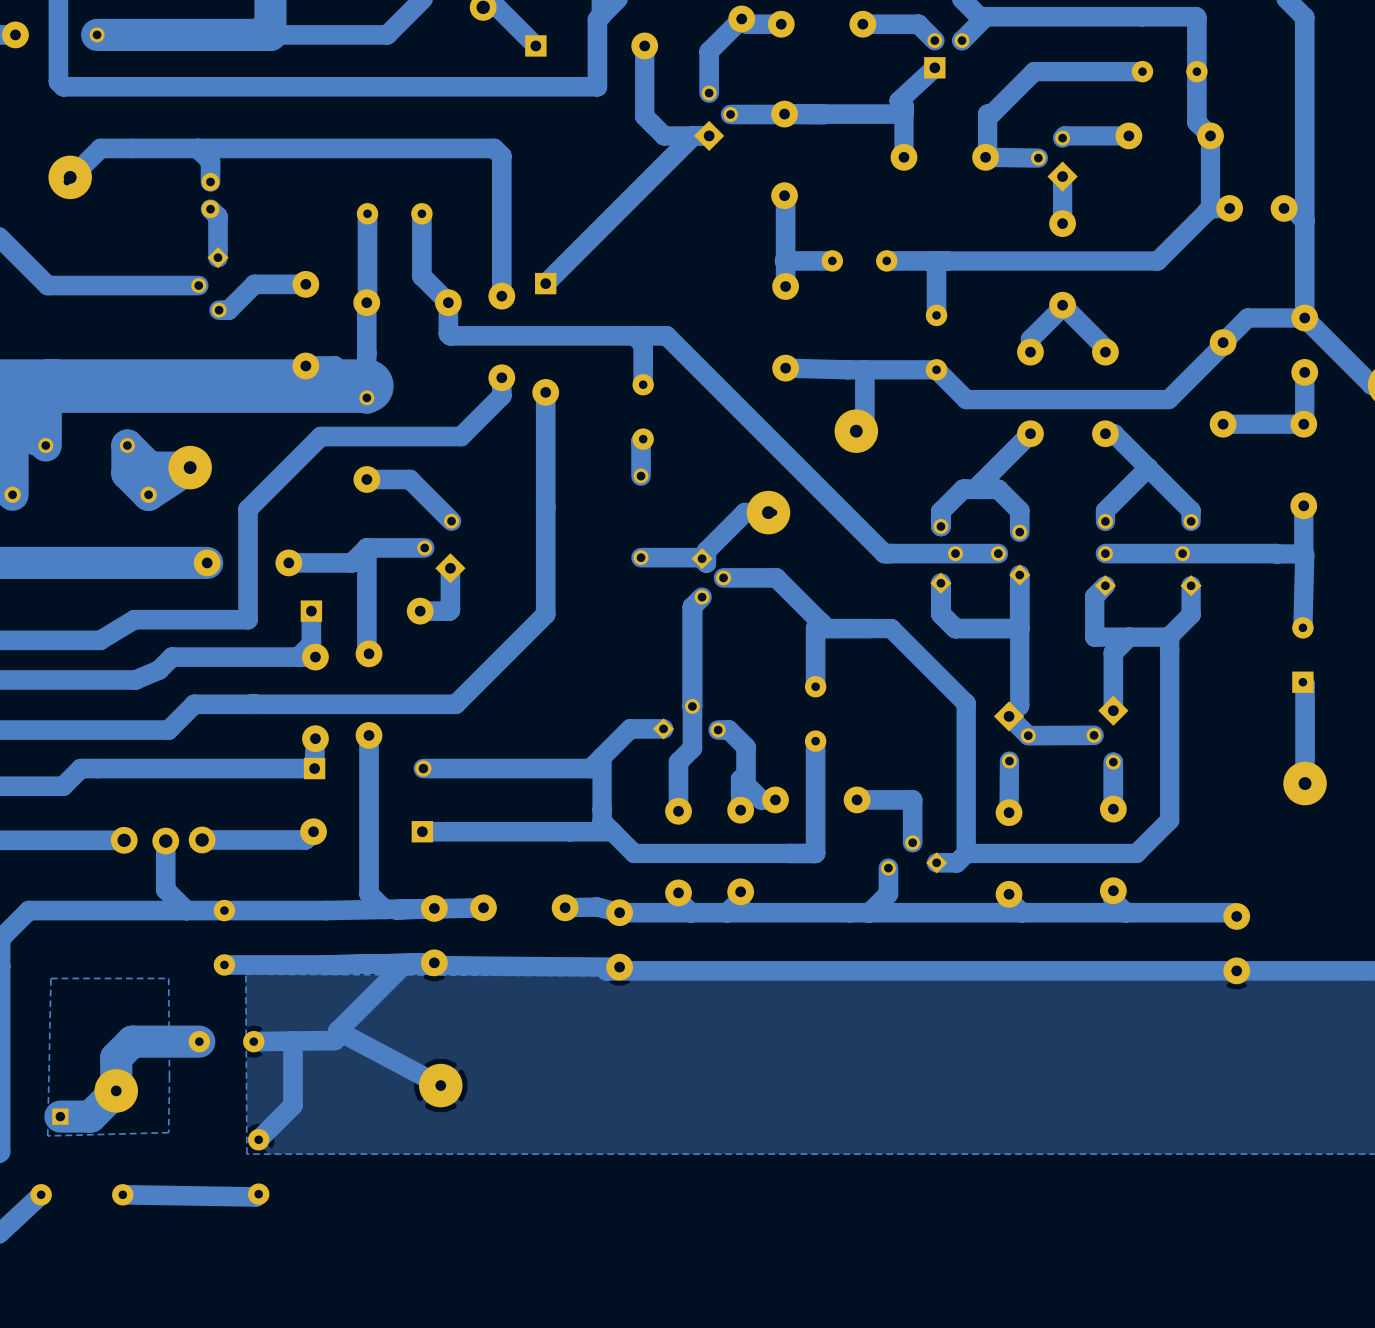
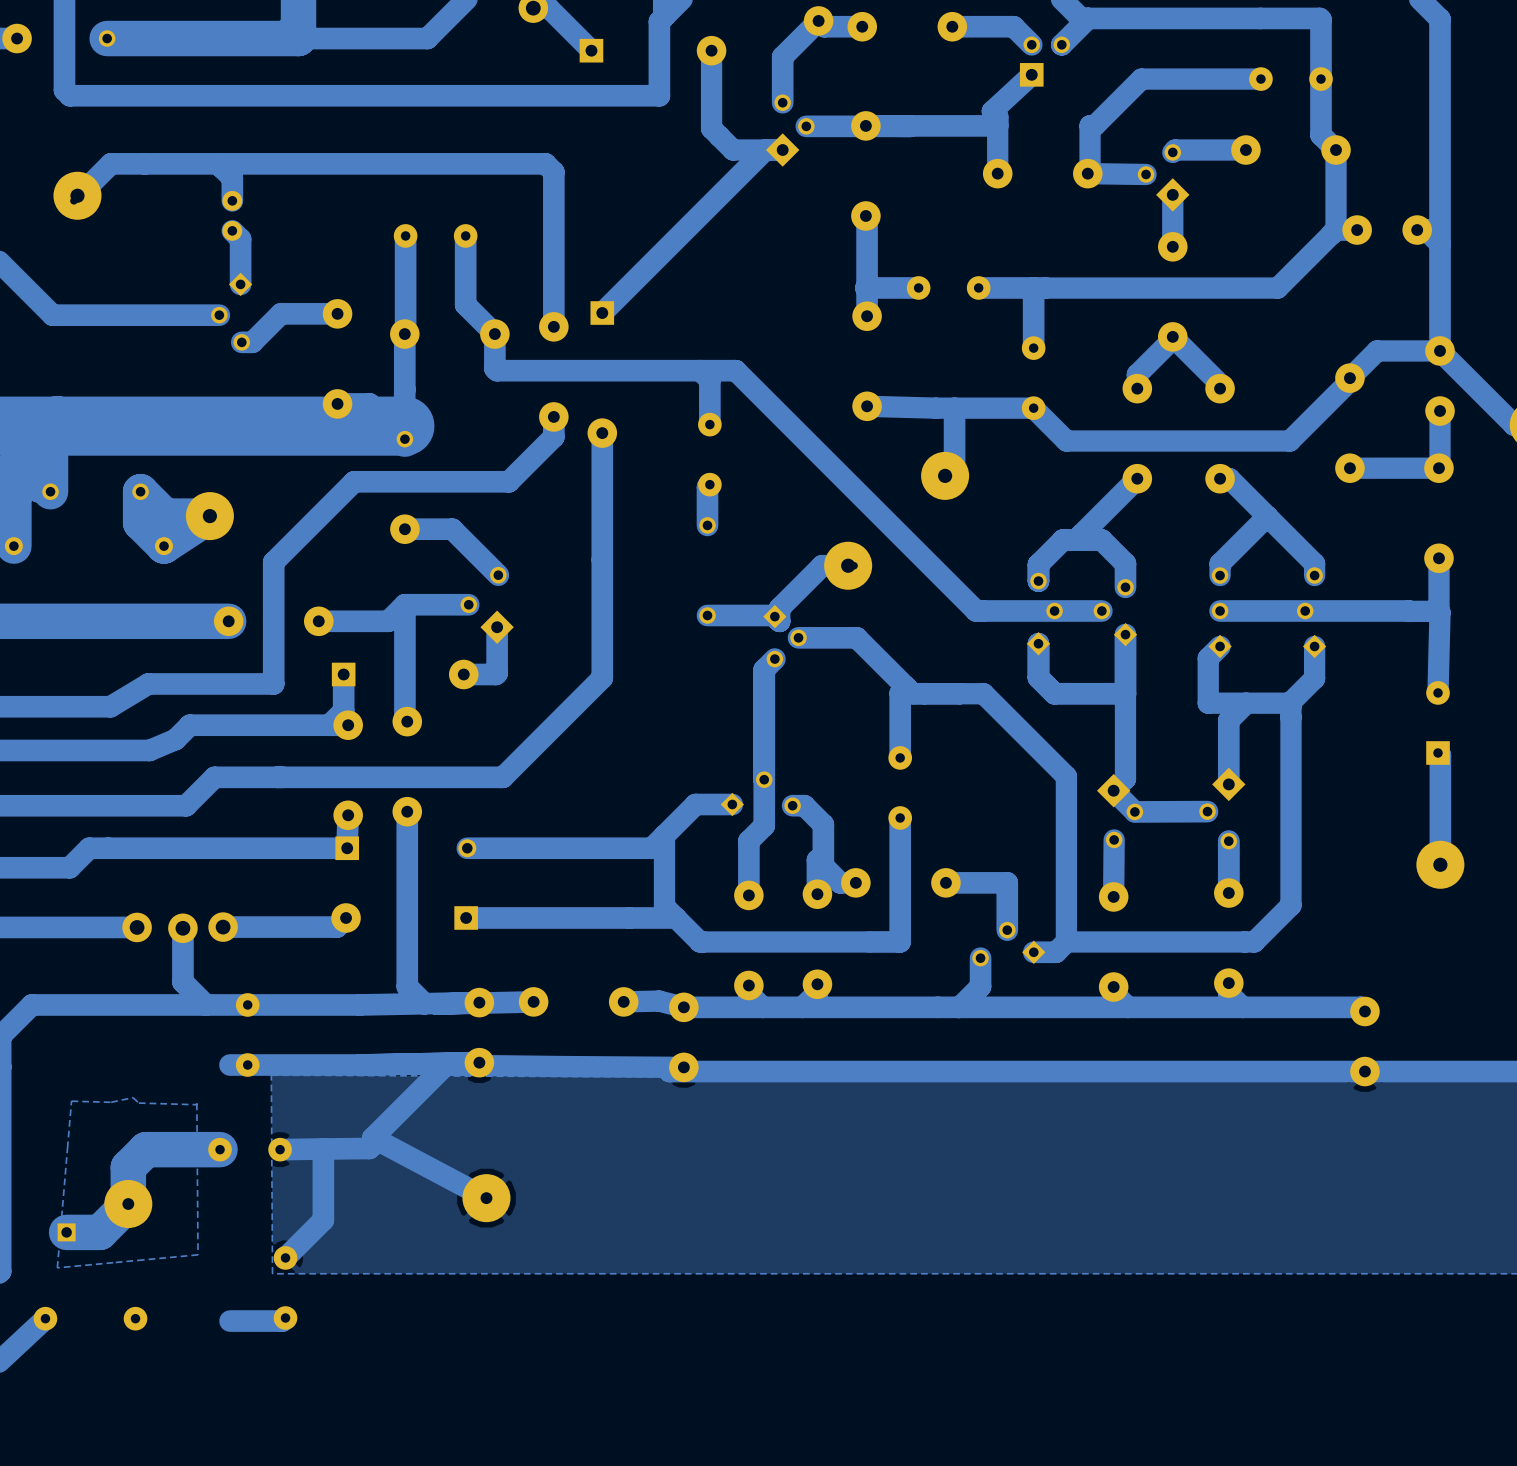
track: none -> (247, 1065) (229, 1065)
zone outline: (168, 978) (50, 978) (47, 1135) (168, 1132) (168, 978) -> (133, 1097) (138, 1103) (196, 1103) (198, 1254) (57, 1267) (71, 1101) (111, 1102) (133, 1097)
track: (122, 1194) (255, 1196) -> (230, 1321) (282, 1321)

